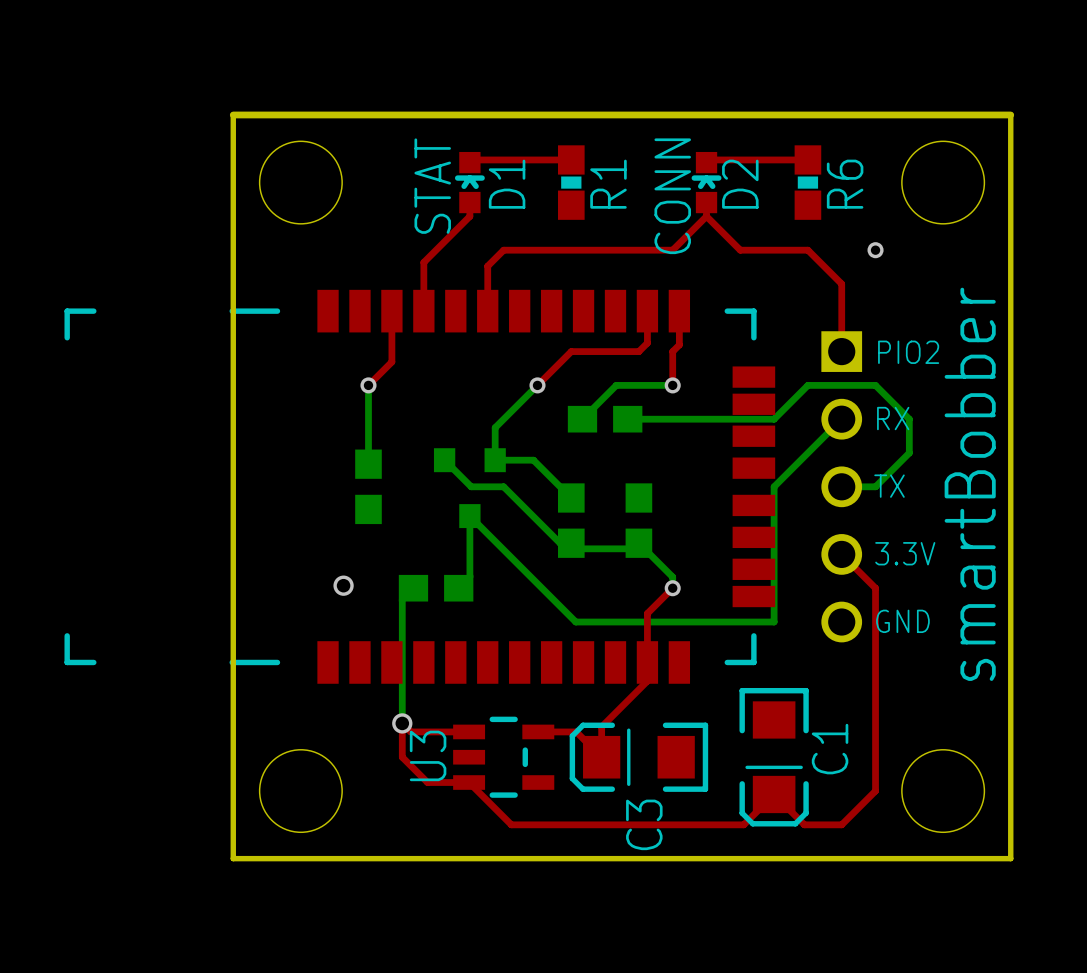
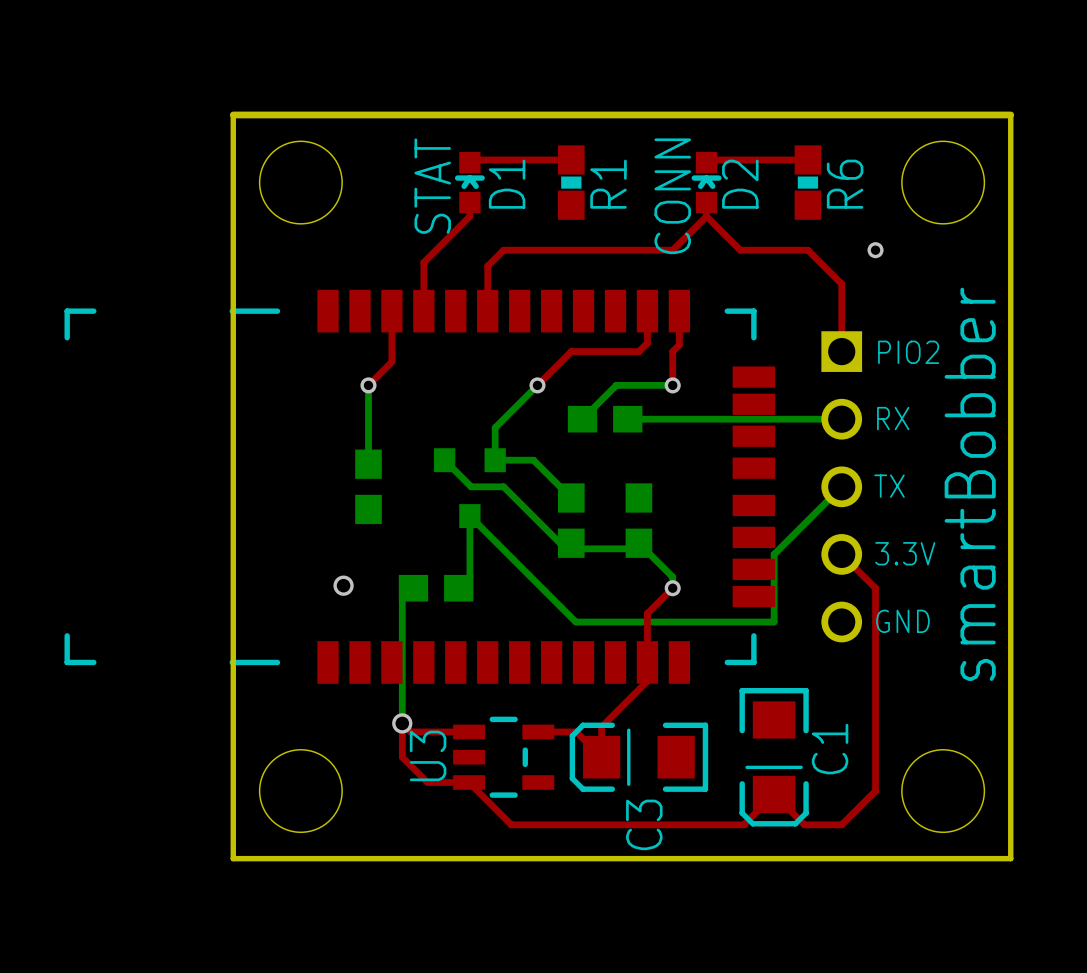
bottom track: (774, 419) (807, 385) (875, 385) (909, 419) (909, 453) (875, 486) (841, 486) -> (774, 419) (841, 419)
bottom track: (841, 419) (774, 486) (774, 554) -> (841, 486) (774, 554)

